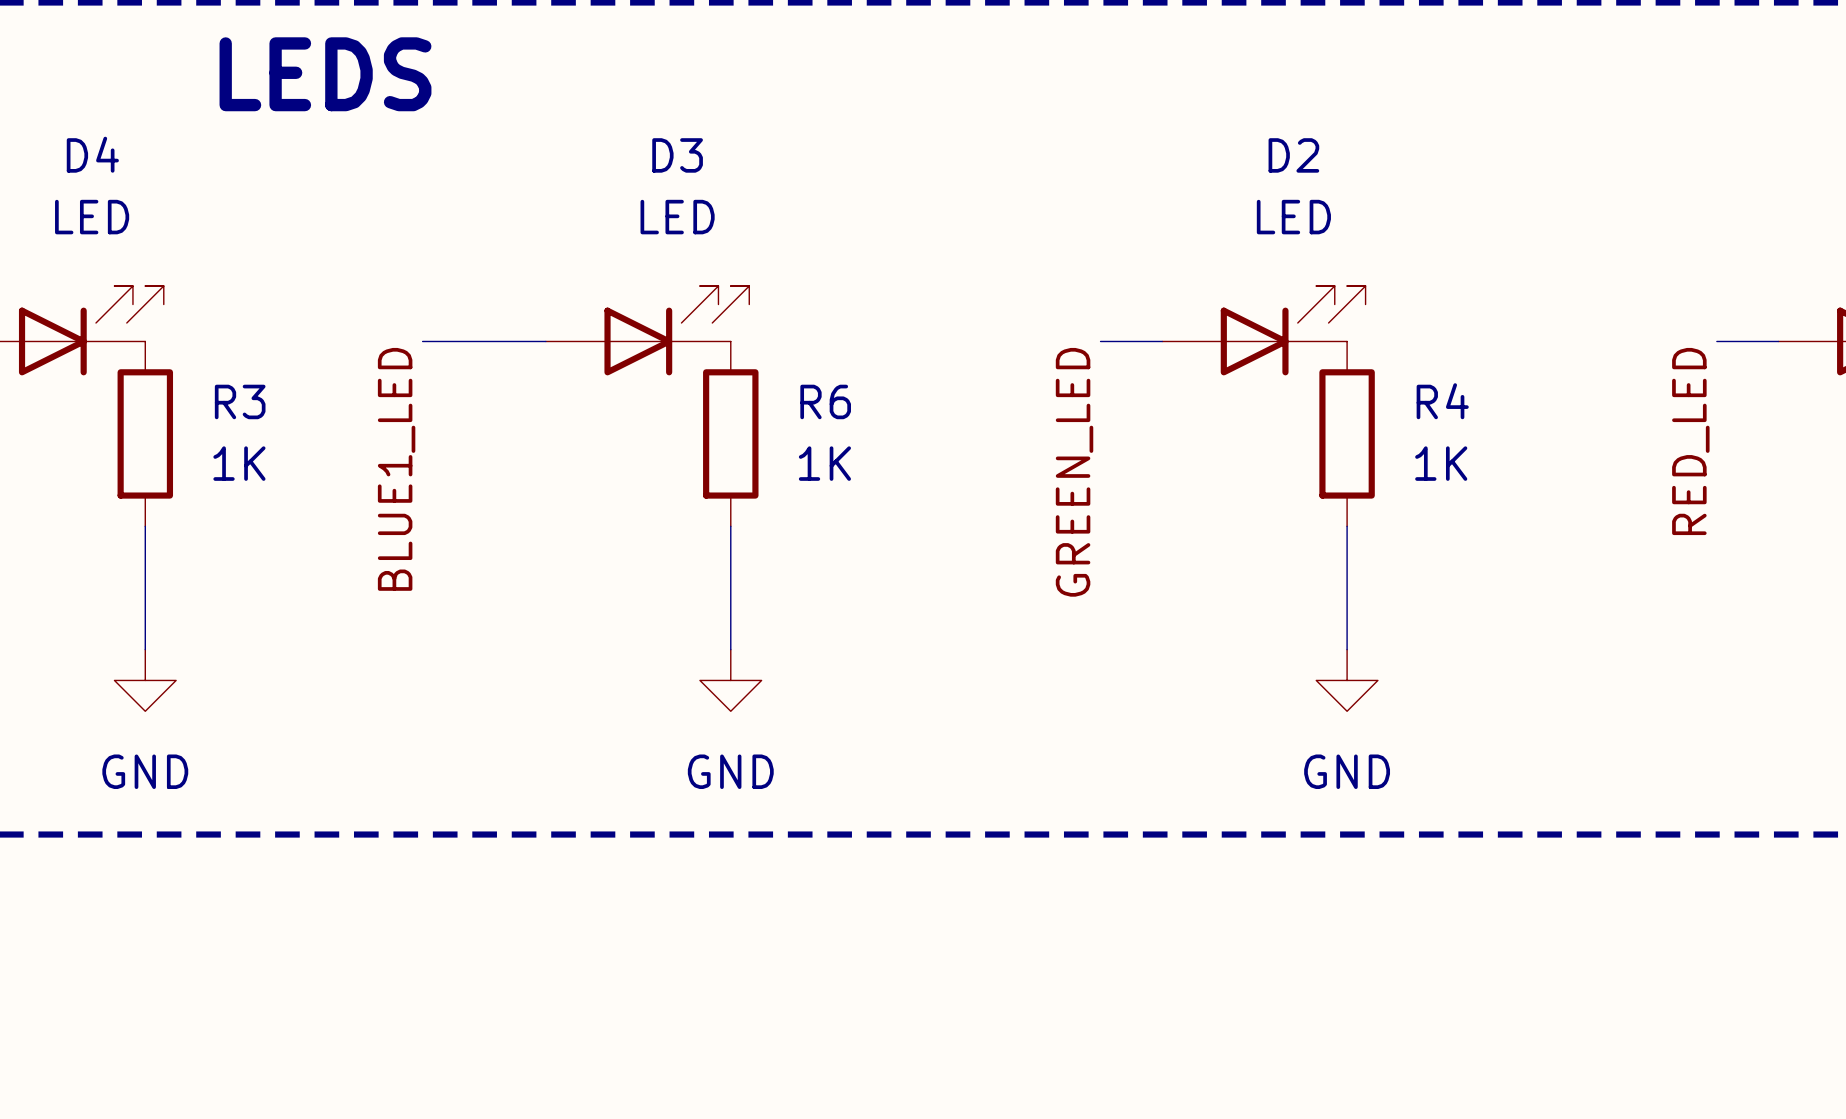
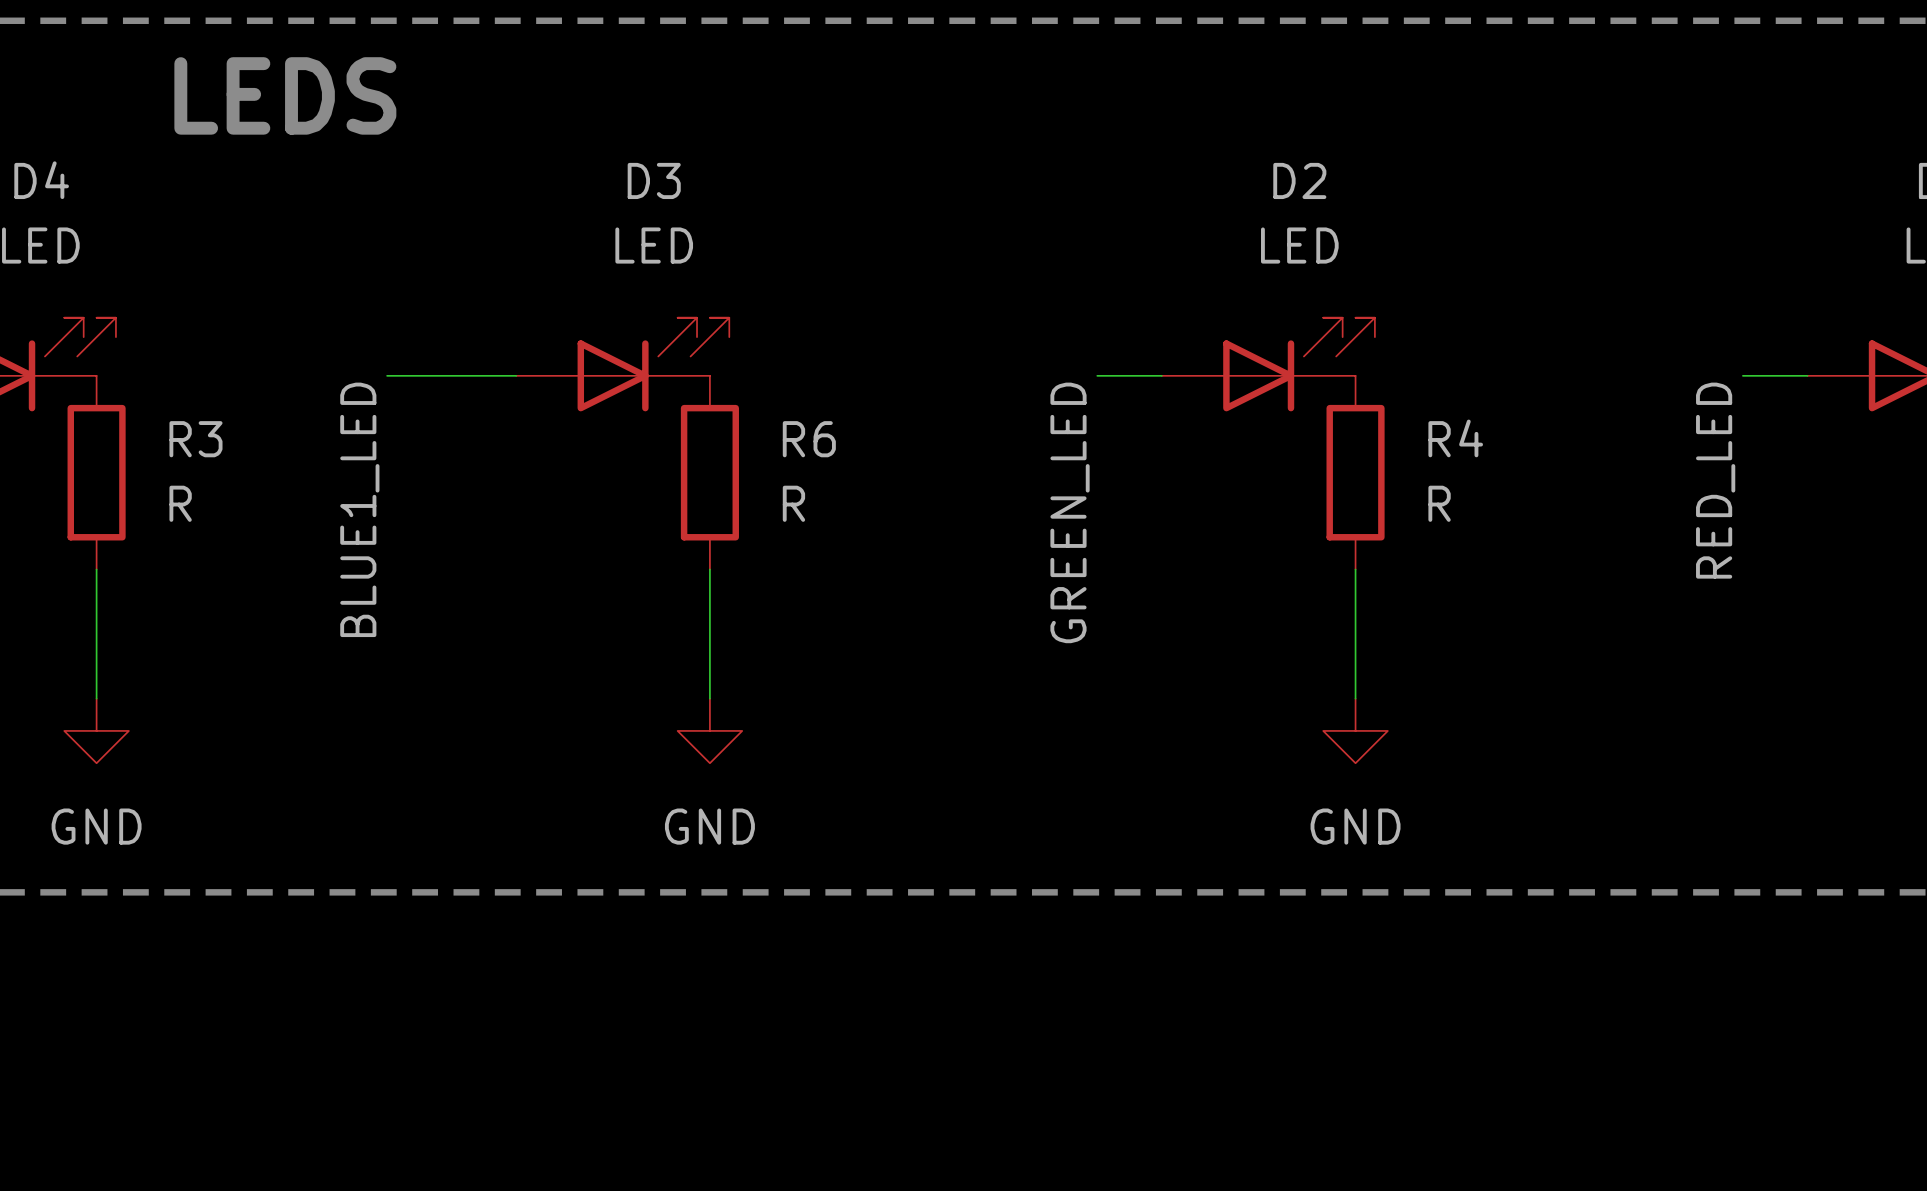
R3 value: 1K (239, 463) -> R (180, 503)
R6 value: 1K (824, 463) -> R (793, 503)
R4 value: 1K (1441, 463) -> R (1439, 503)

